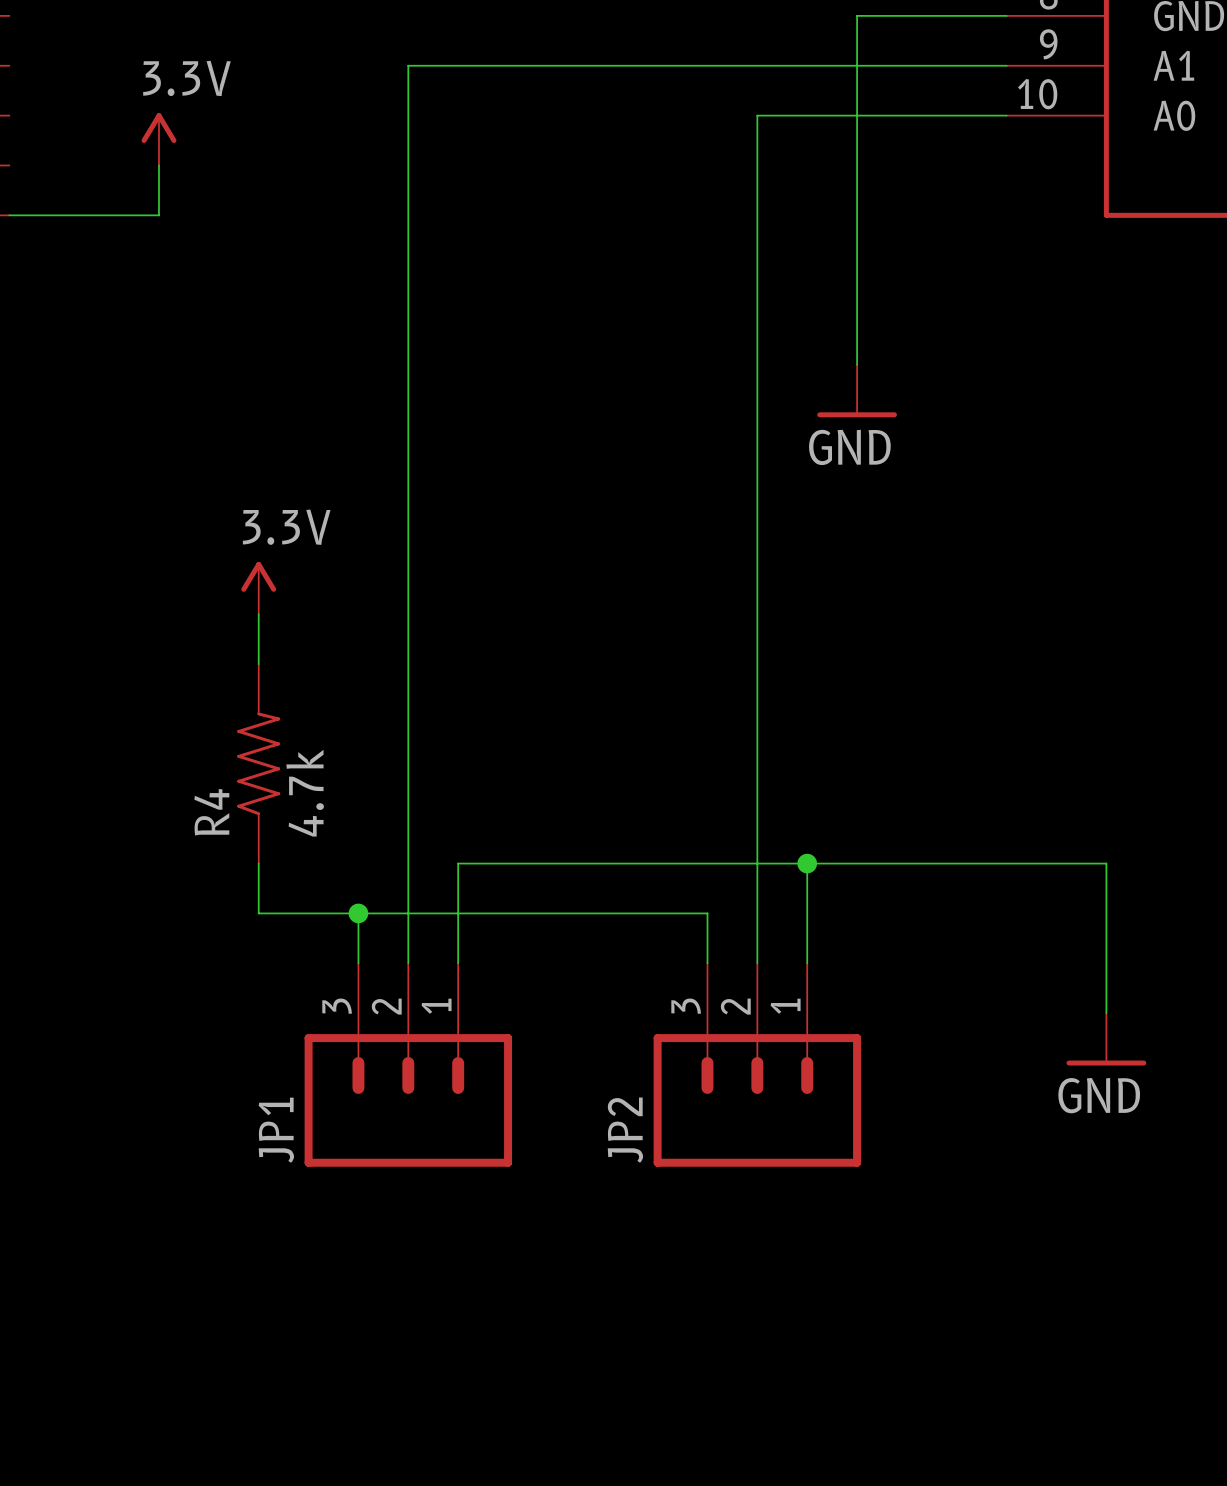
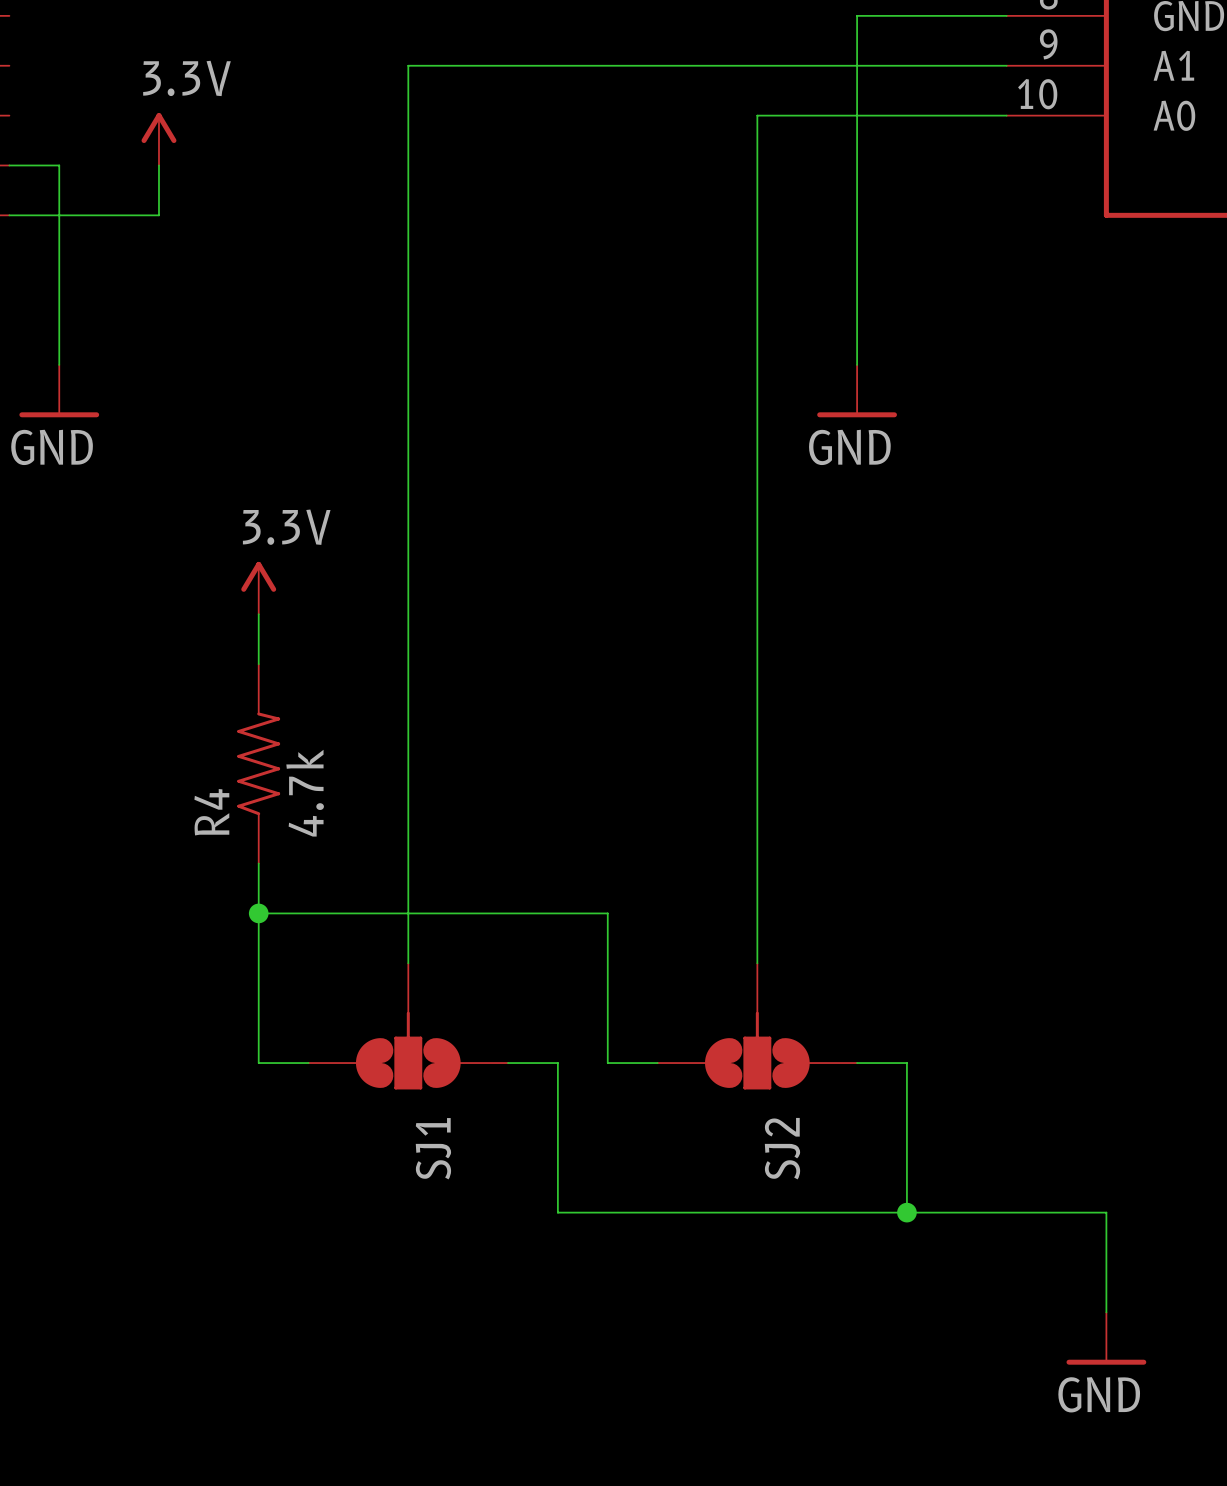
wire: none -> (9, 165) (59, 165) (59, 364)
power symbol: none -> GND (59, 391)
wire: (807, 863) (807, 963) -> none
junction: (807, 863) -> none
wire: none -> (258, 913) (258, 1063) (308, 1063)
wire: (358, 913) (358, 963) -> none
junction position: (358, 913) -> (258, 913)
wire: (607, 913) (707, 913) (707, 963) -> (607, 913) (607, 1063) (657, 1063)
wire: (458, 963) (458, 863) (1106, 863) (1106, 1013) -> none
SJ1: none -> (408, 1026)
SJ2: none -> (757, 1026)
power symbol position: GND (1106, 1039) -> GND (1106, 1338)
wire: none -> (508, 1063) (557, 1063) (557, 1212) (1106, 1212) (1106, 1312)
wire: none -> (857, 1063) (906, 1063) (906, 1212)
JP1: (408, 1065) -> none
JP2: (757, 1065) -> none
junction: none -> (906, 1212)

